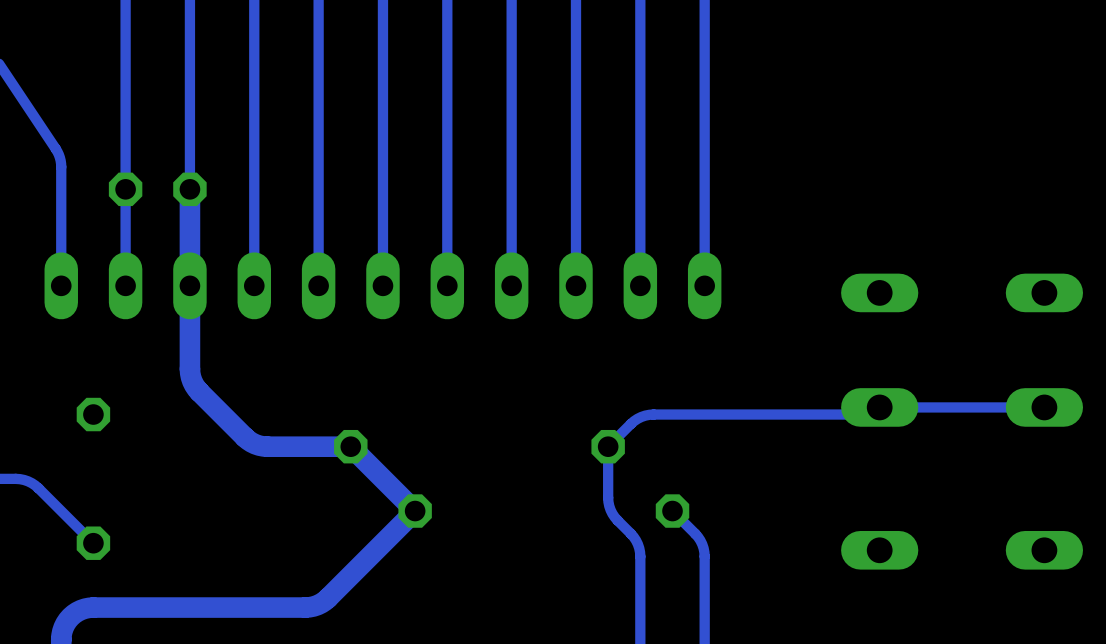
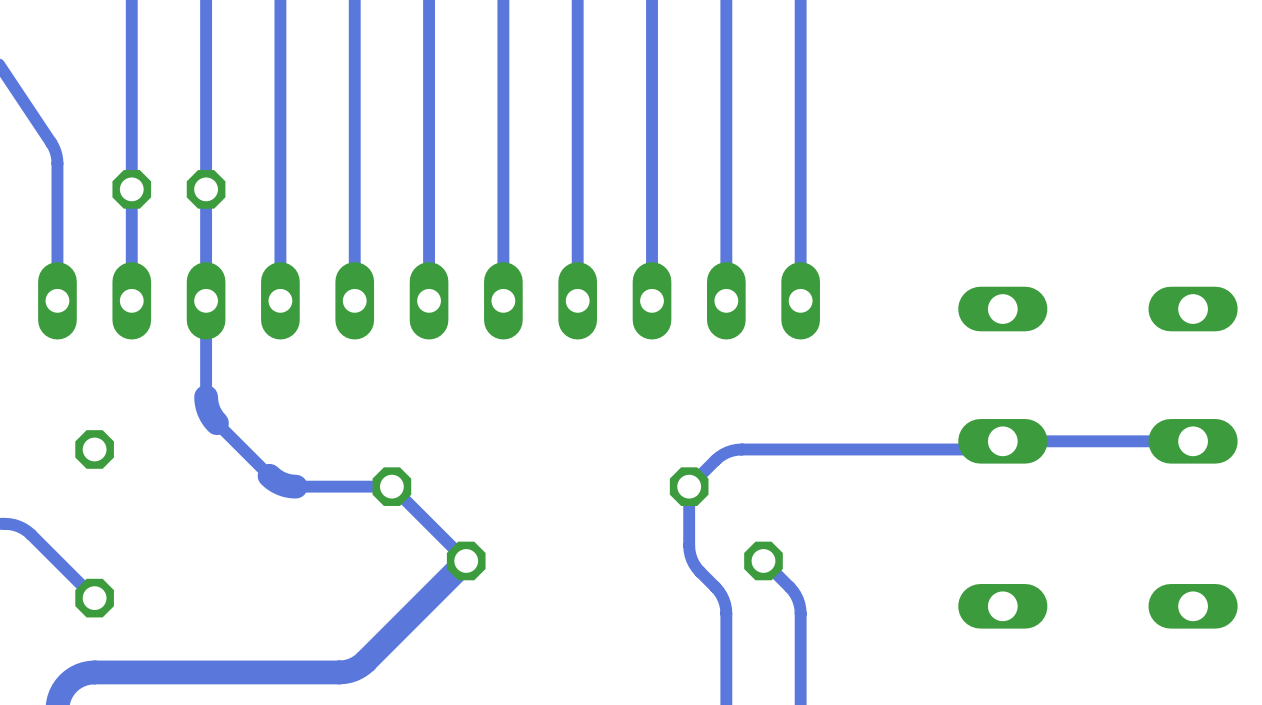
track width: thick (189, 189) (189, 369) -> thin (206, 189) (206, 396)
track width: thick (199, 391) (244, 437) -> thin (216, 423) (269, 475)
track width: thick (267, 446) (350, 446) (415, 511) -> thin (295, 486) (391, 486) (466, 560)

